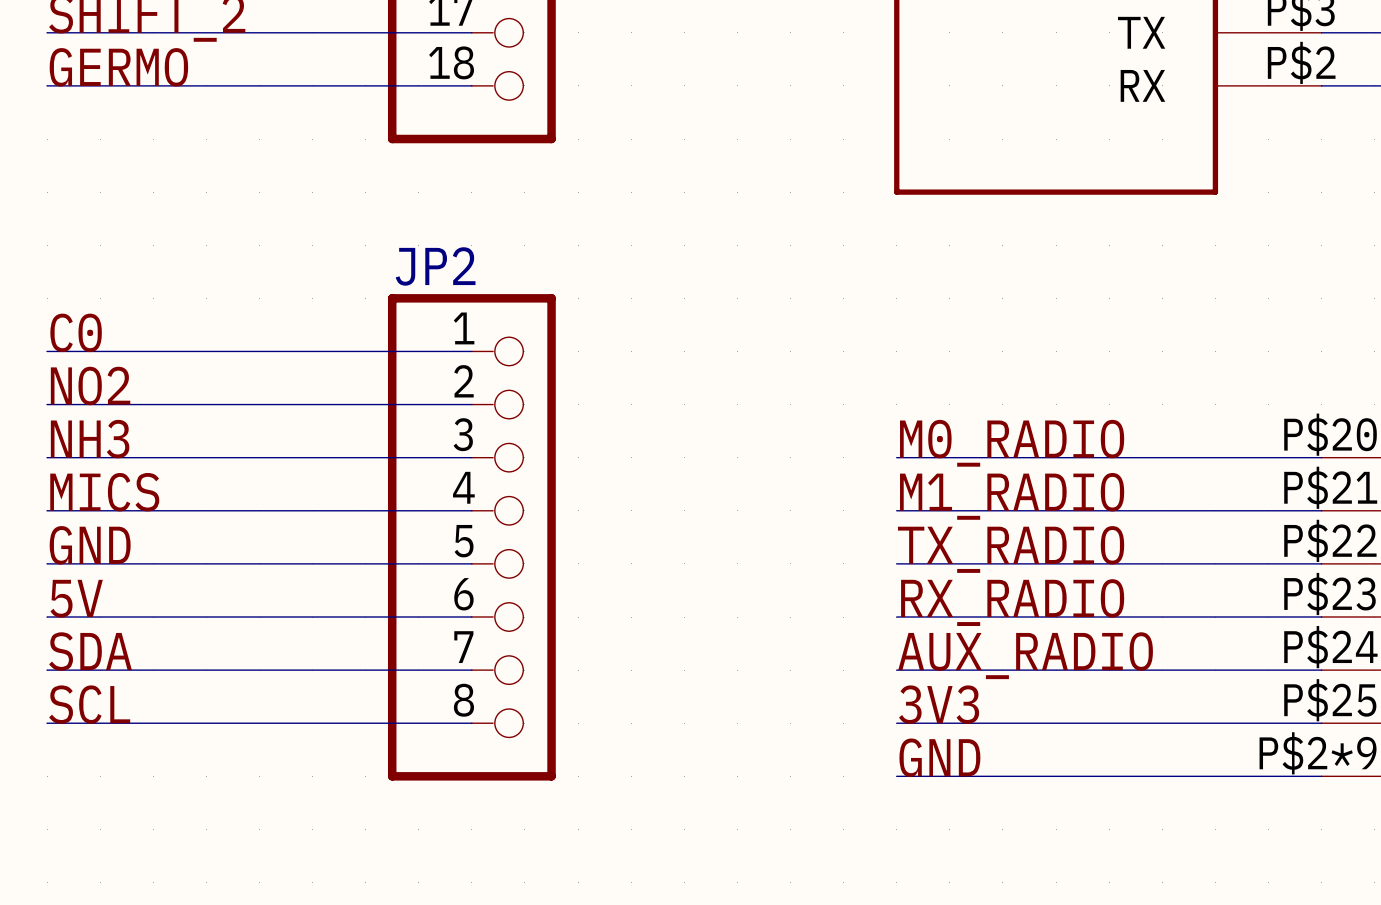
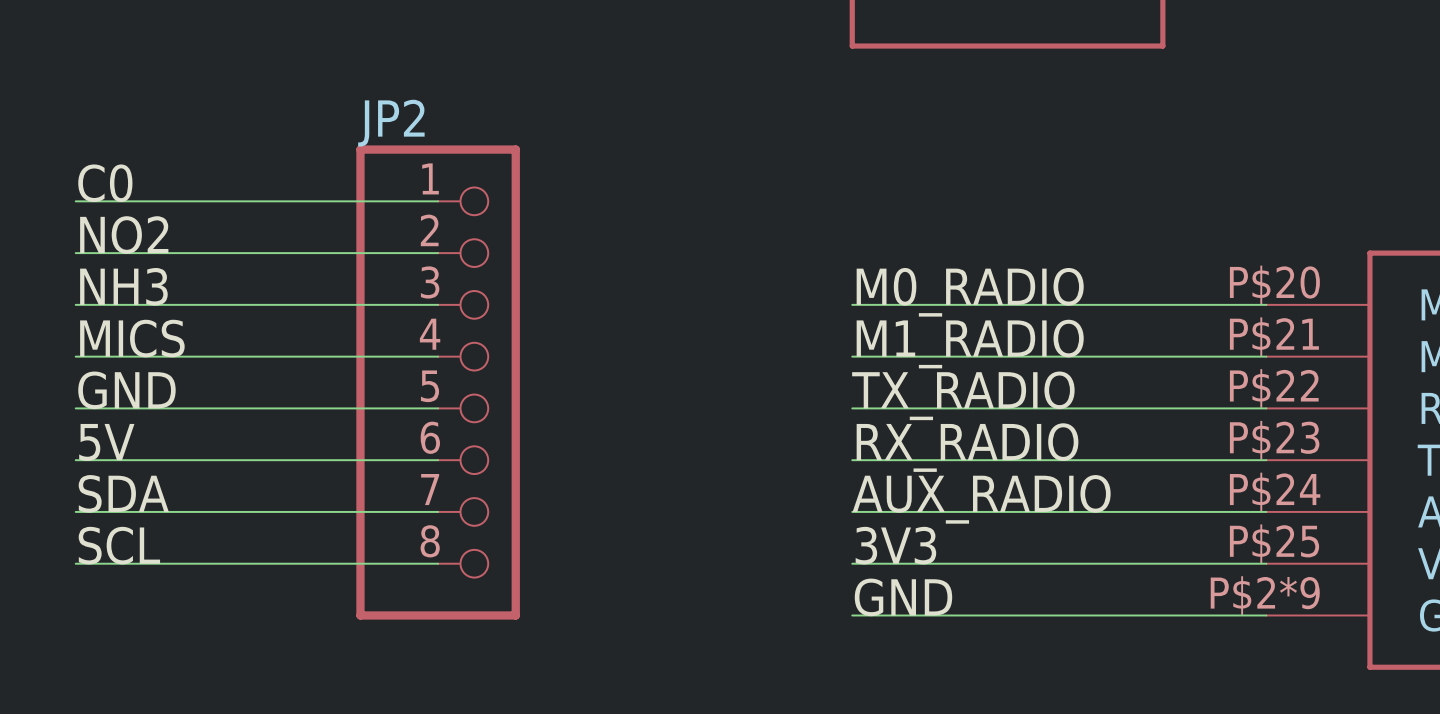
label position: C0 (76, 332) -> C0 (105, 183)
wire: (47, 351) (100, 351) -> none
label position: NO2 (90, 385) -> NO2 (124, 235)
wire: (47, 404) (100, 404) -> none
label position: NH3 (90, 439) -> NH3 (123, 286)
wire: (47, 457) (100, 457) -> none
label position: MICS (104, 492) -> MICS (132, 338)
wire: (47, 510) (100, 510) -> none
label position: GND (90, 545) -> GND (126, 390)
wire: (47, 563) (100, 563) -> none
label position: 5V (76, 598) -> 5V (106, 442)
wire: (47, 617) (100, 617) -> none
label position: SDA (90, 651) -> SDA (123, 493)
wire: (47, 670) (100, 670) -> none
label position: SCL (89, 704) -> SCL (119, 545)
wire: (47, 723) (100, 723) -> none

